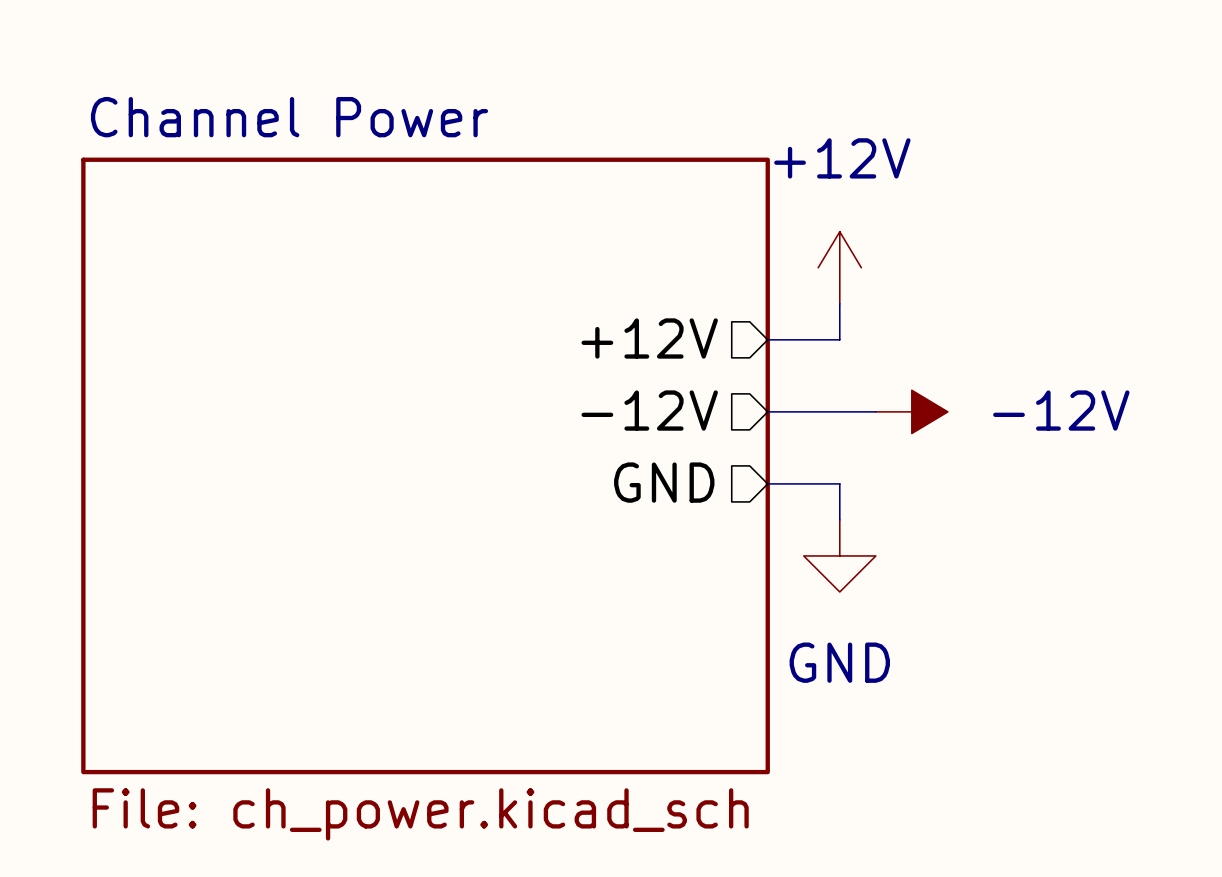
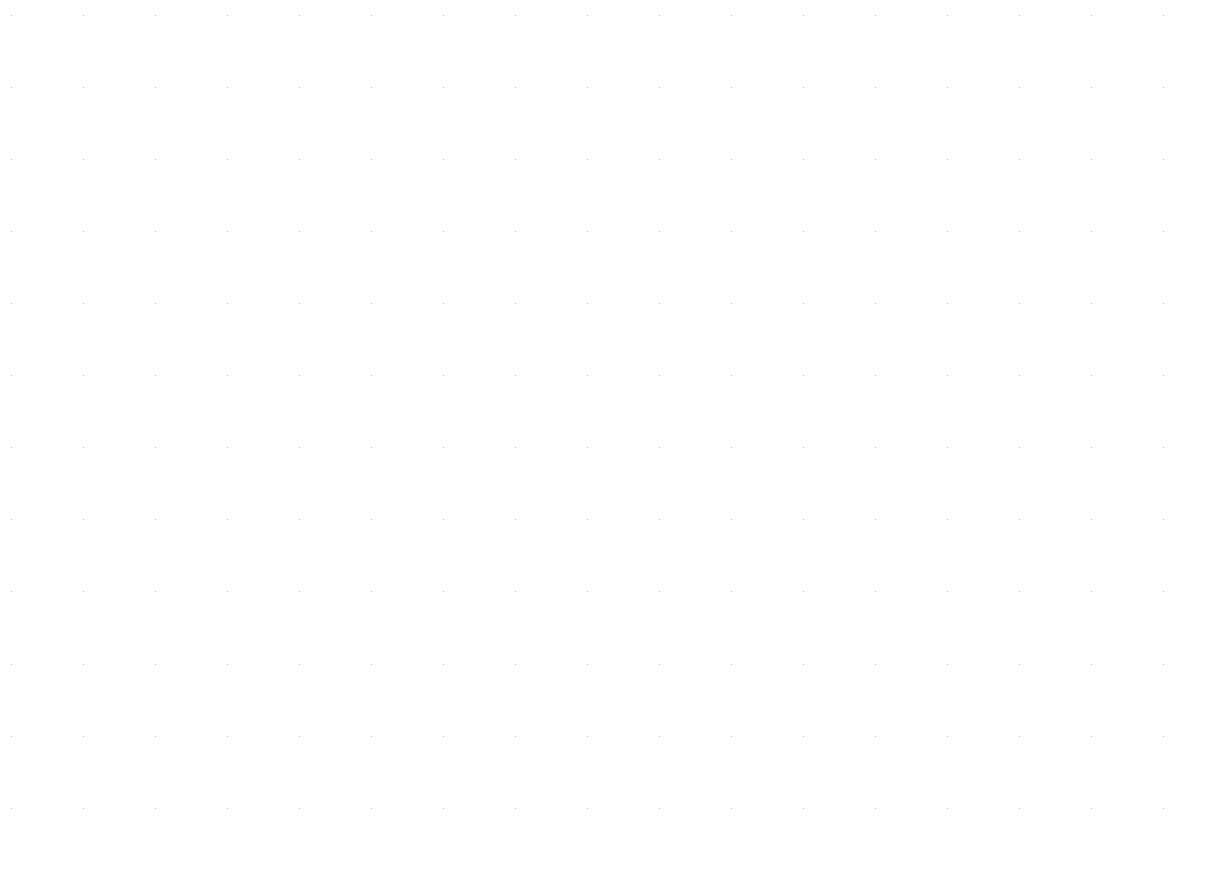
power symbol: +12V (839, 267) -> none
wire: (839, 303) (839, 339) (767, 339) -> none
sheet pin: +12V (649, 338) -> none
sheet pin: -12V (649, 410) -> none
wire: (767, 411) (875, 411) -> none
power symbol: -12V (911, 411) -> none
sheet Channel Power: File: ch_power.kicad_sch (425, 465) -> none
sheet pin: GND (664, 482) -> none
wire: (767, 483) (839, 483) (839, 519) -> none
power symbol: GND (839, 555) -> none

